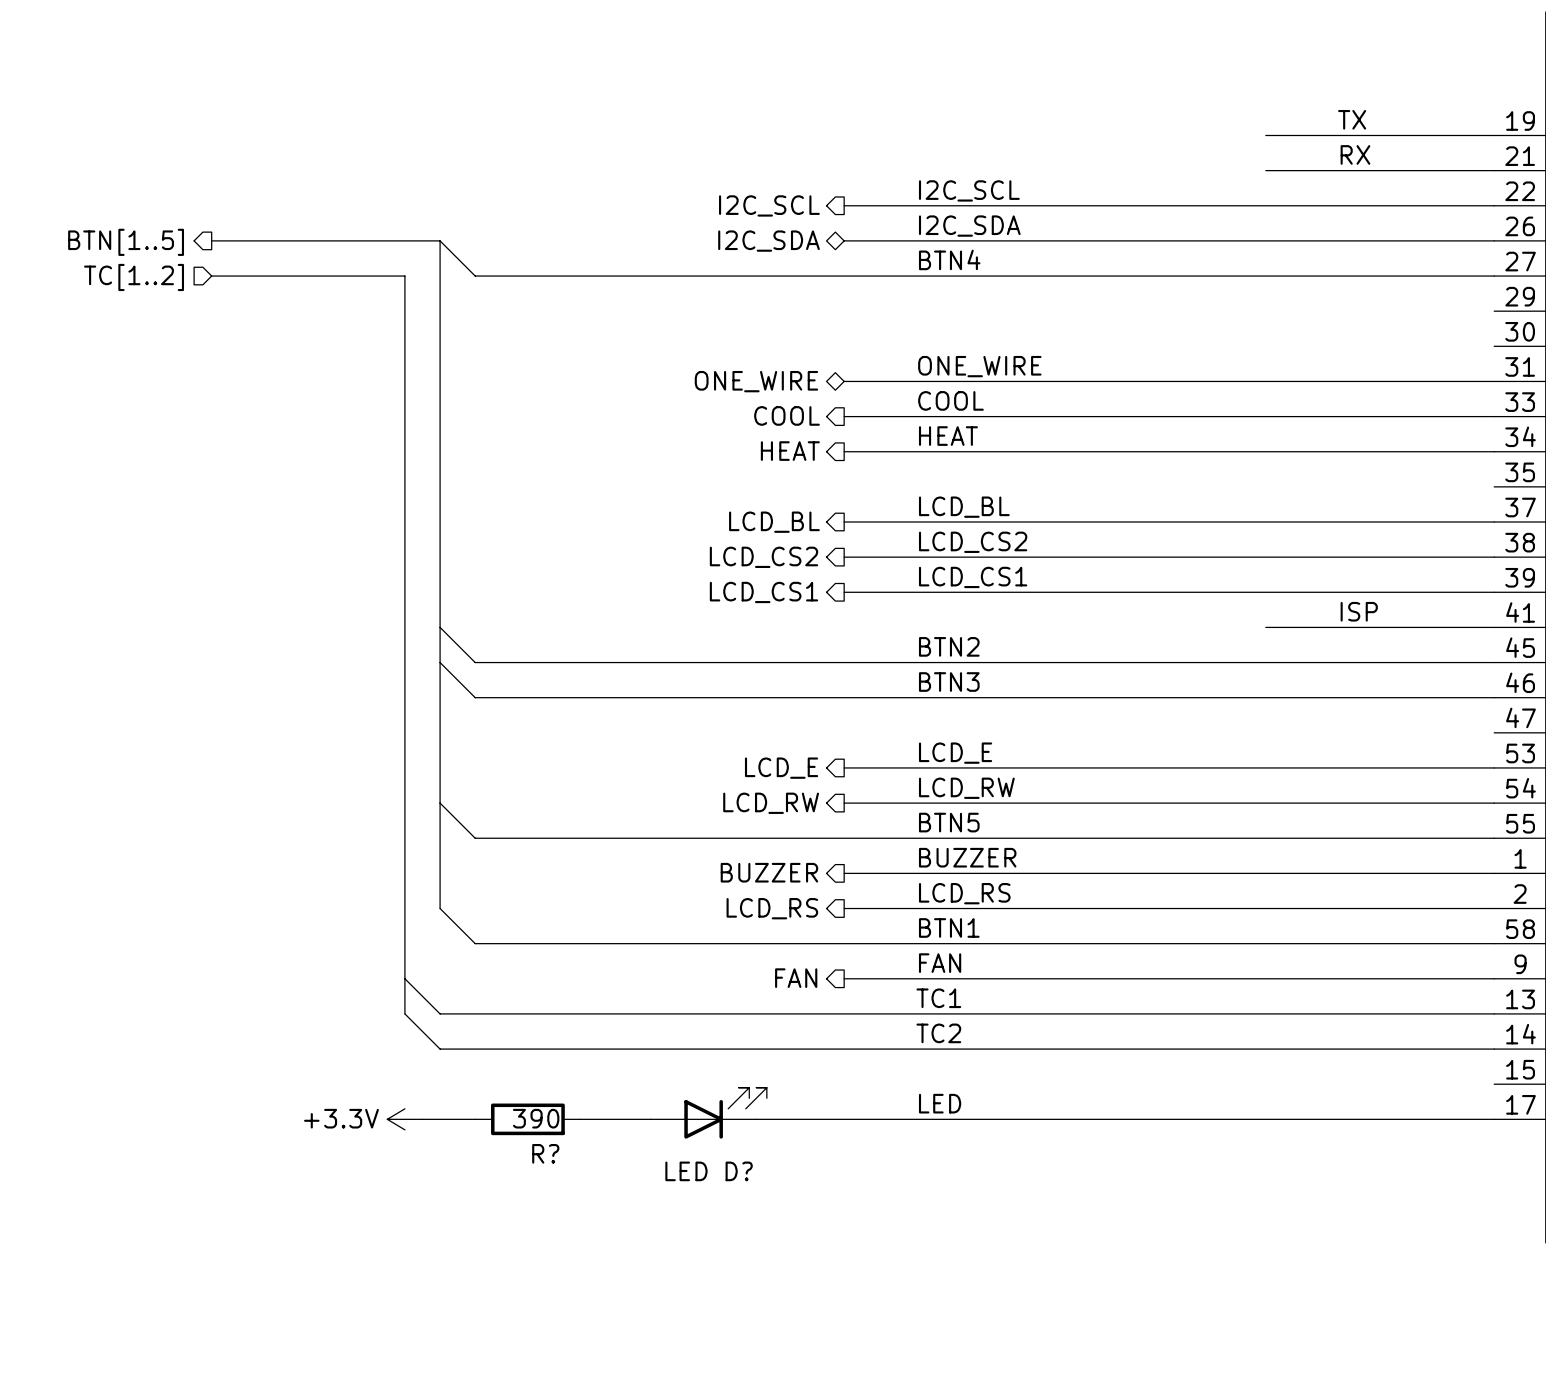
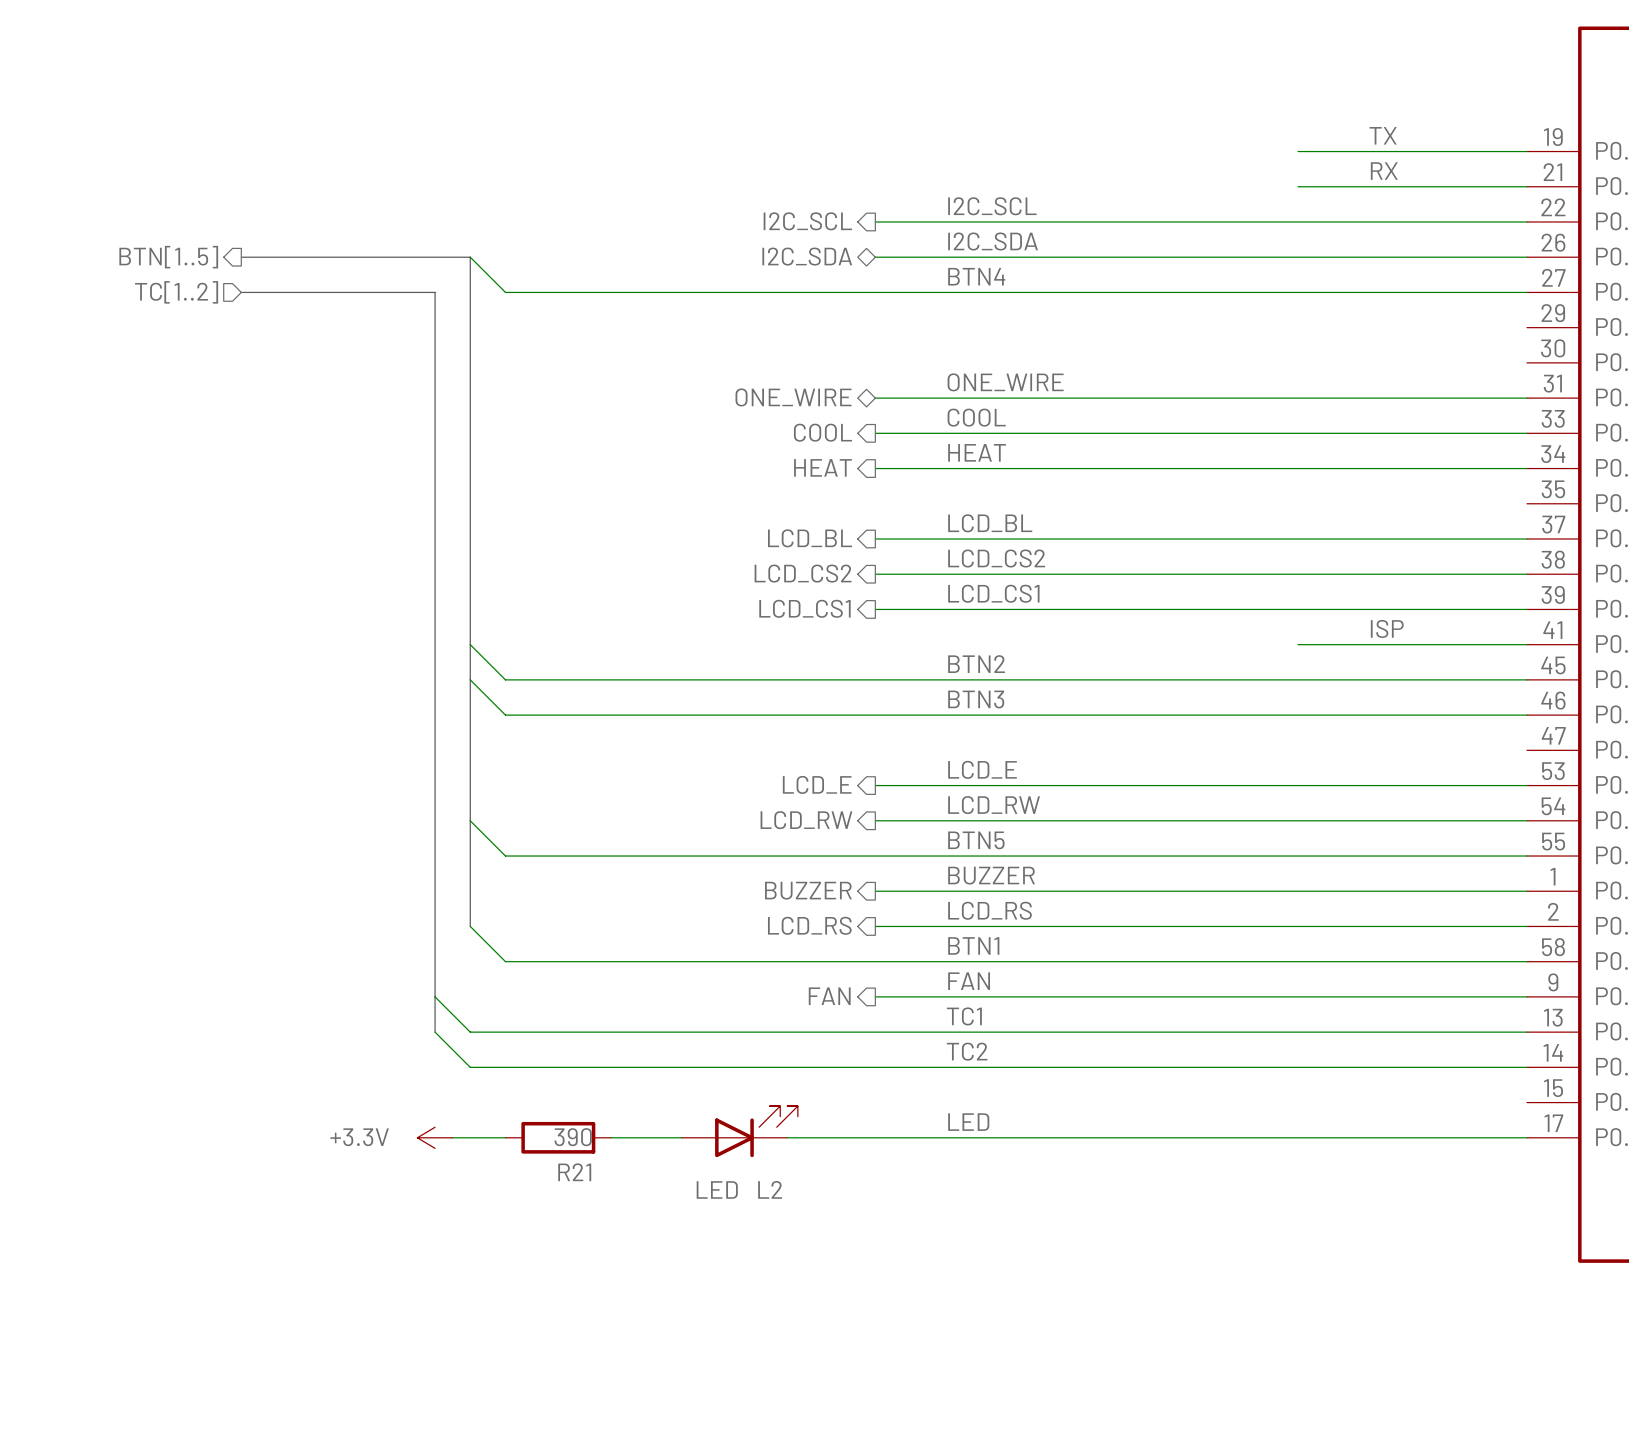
R? name: R? (545, 1153) -> R21 (574, 1172)
D? name: D? (739, 1171) -> L2 (770, 1189)

